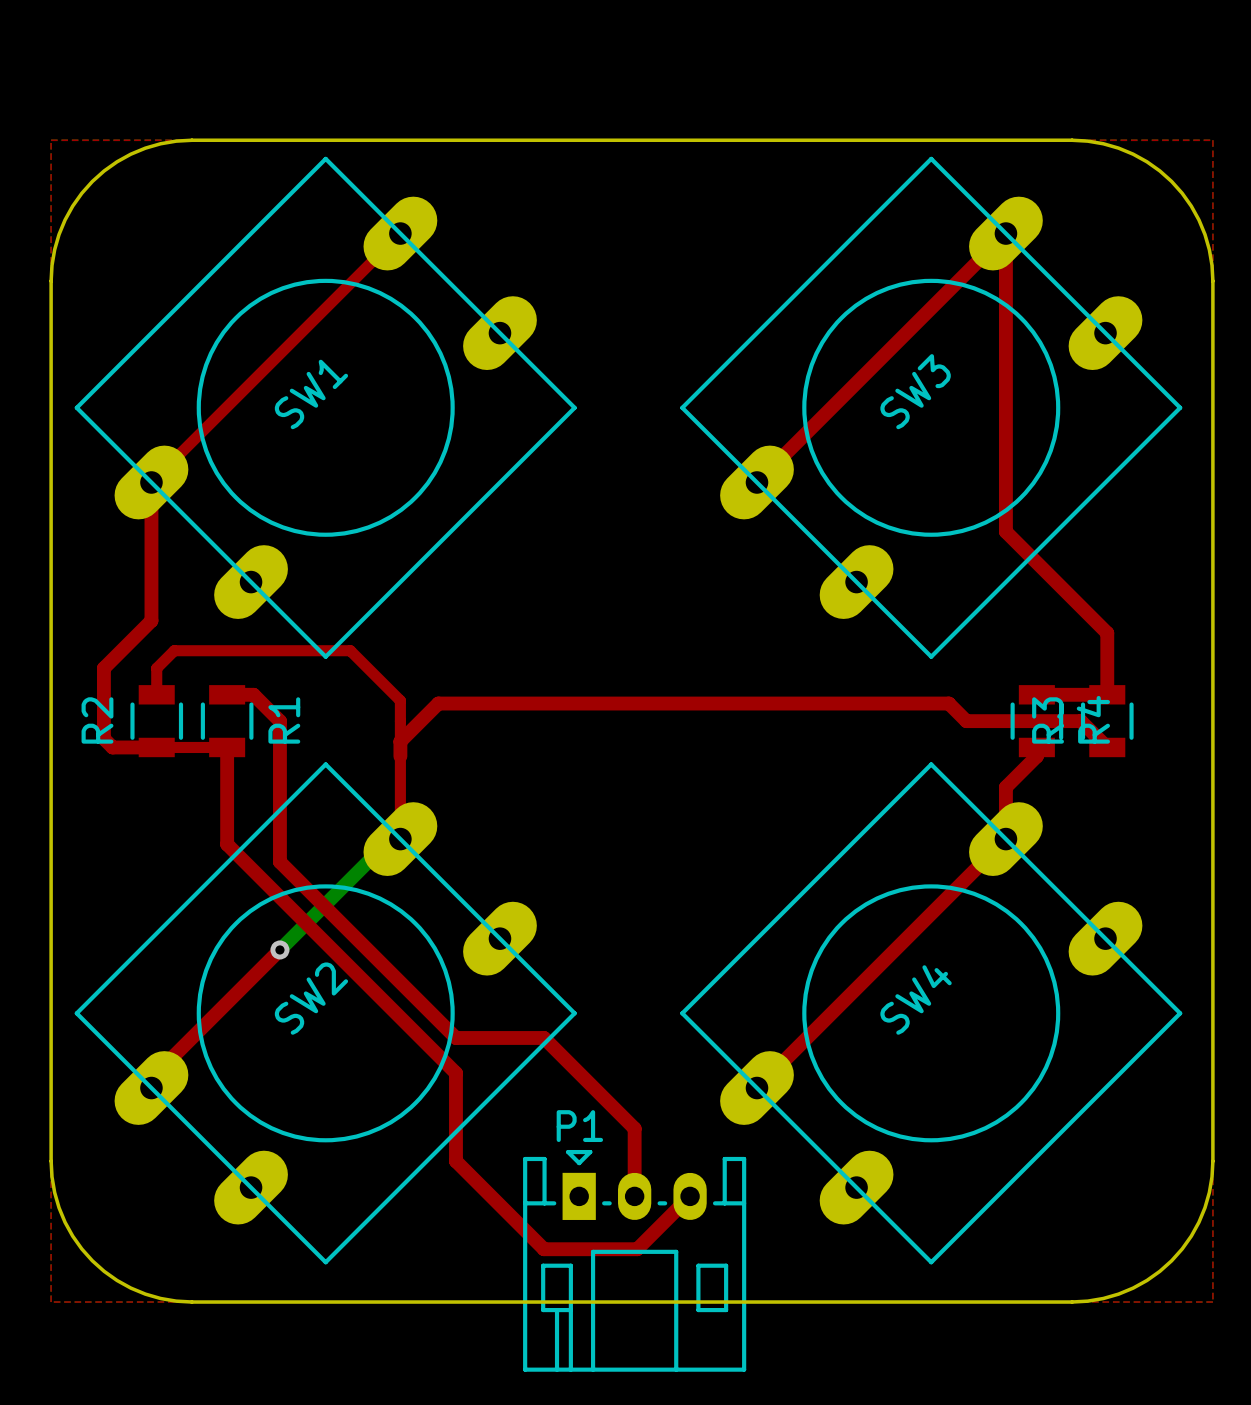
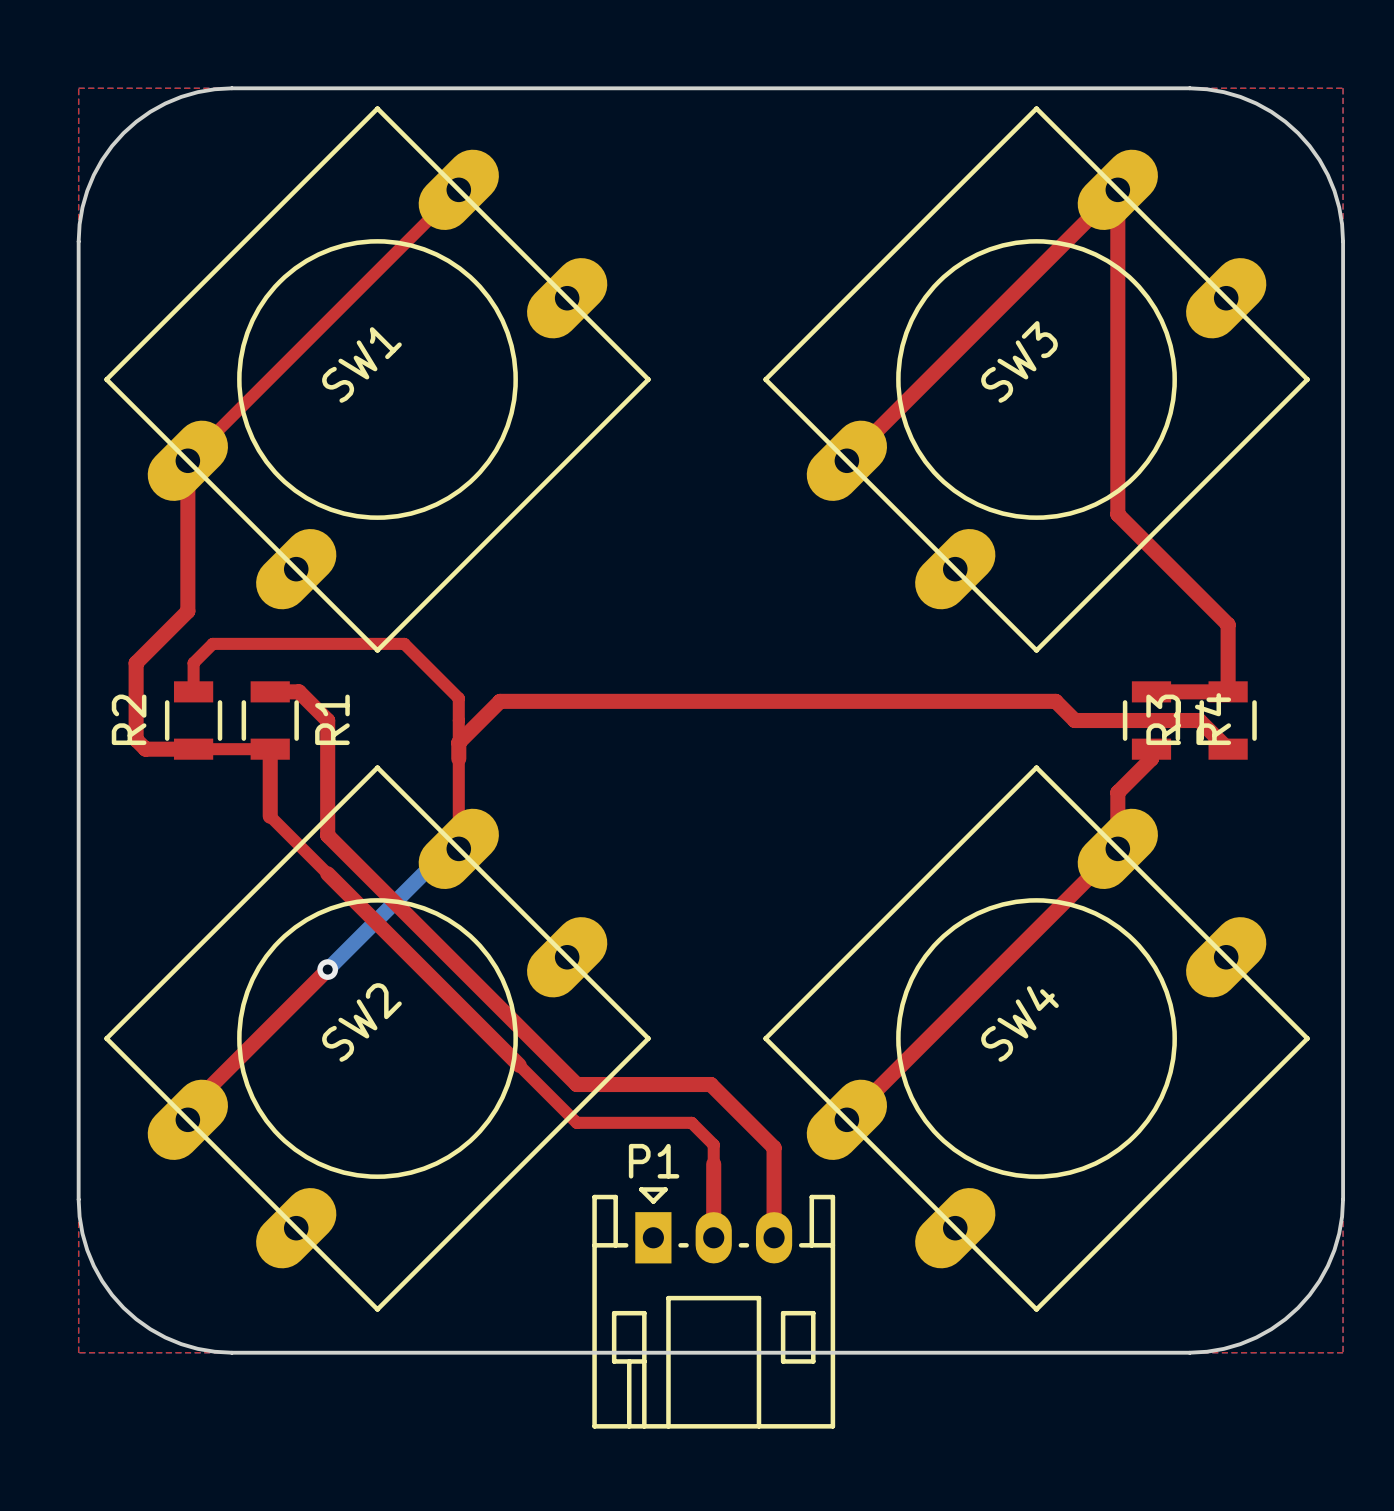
top track: (227, 809) (227, 844) (455, 1073) (455, 1161) (543, 1249) (637, 1249) (690, 1196) -> (327, 835) (576, 1084) (710, 1084) (774, 1147) (774, 1237)
top track: (279, 826) (279, 861) -> (270, 816) (327, 873)
top track: (455, 1037) (543, 1037) (634, 1128) -> (519, 1065) (576, 1122) (691, 1122) (713, 1144) (713, 1164)

